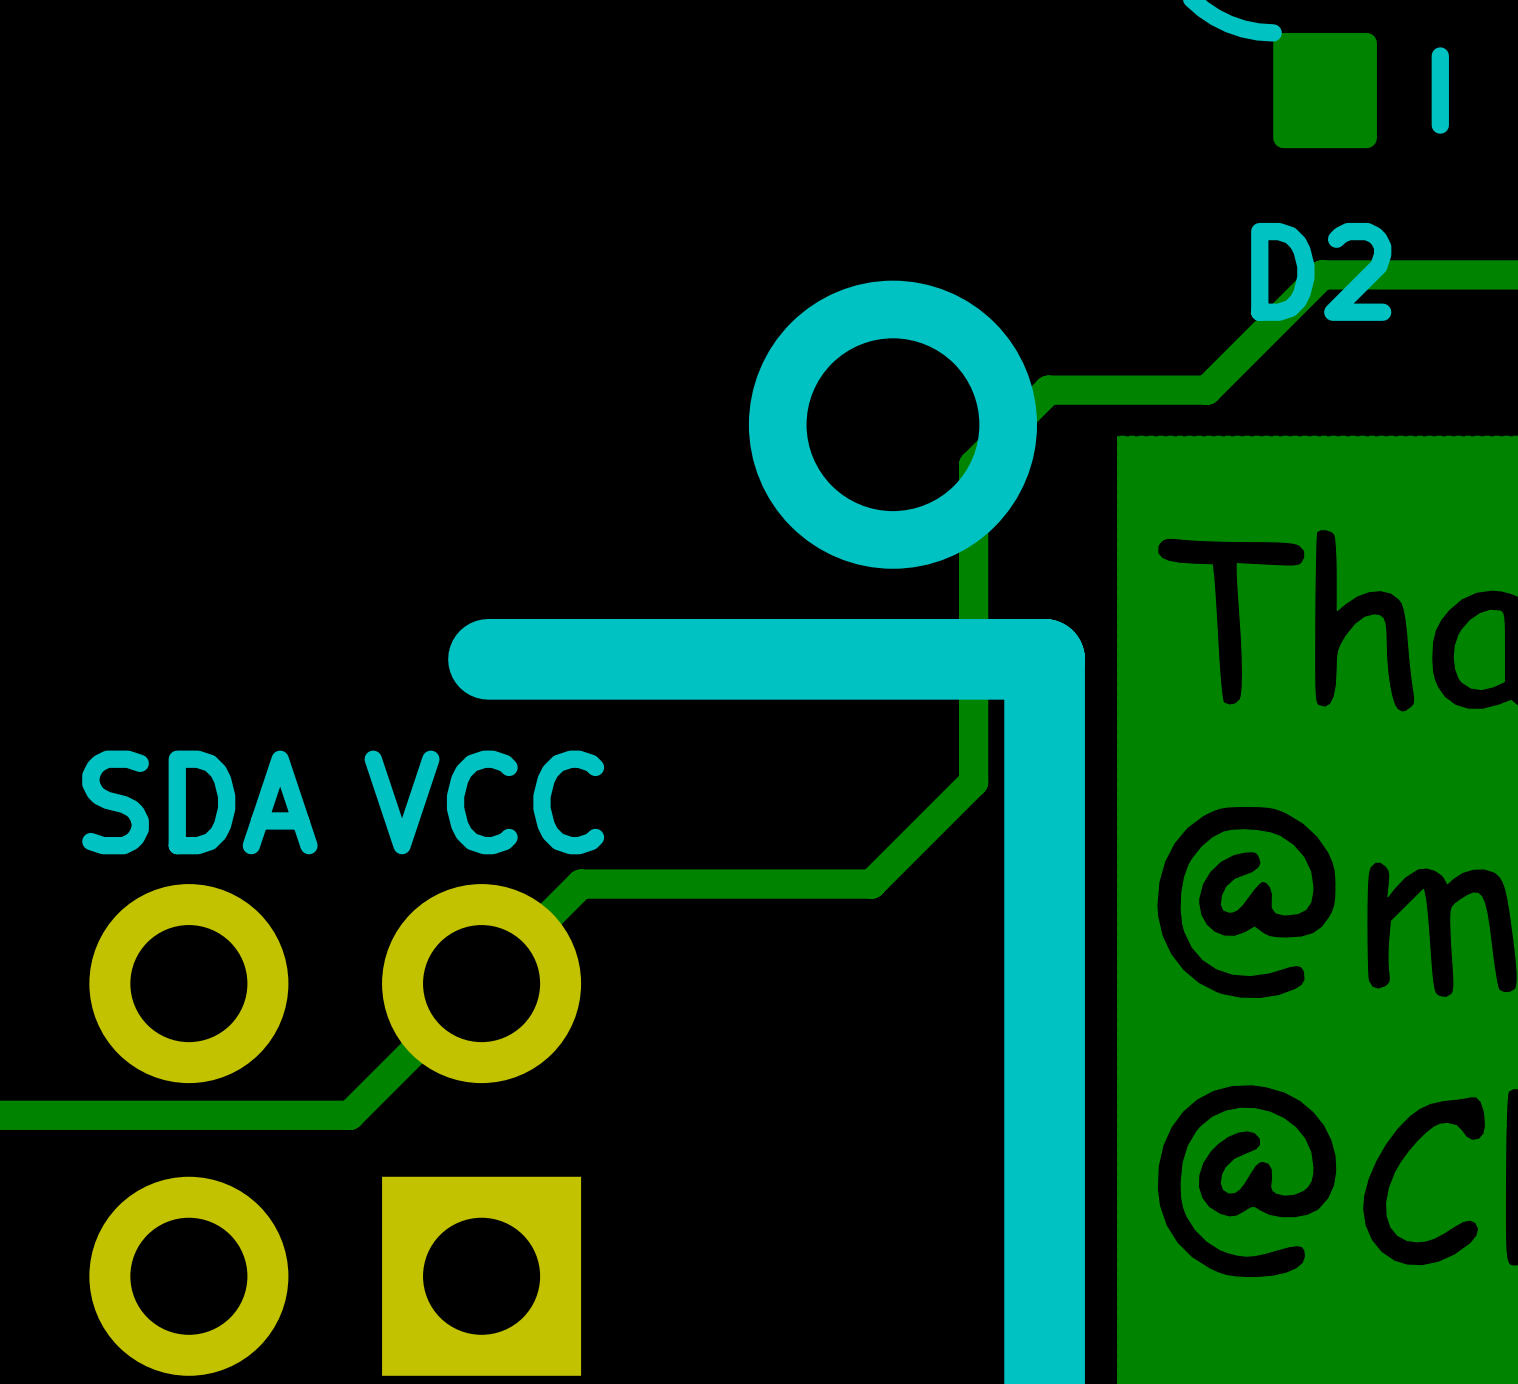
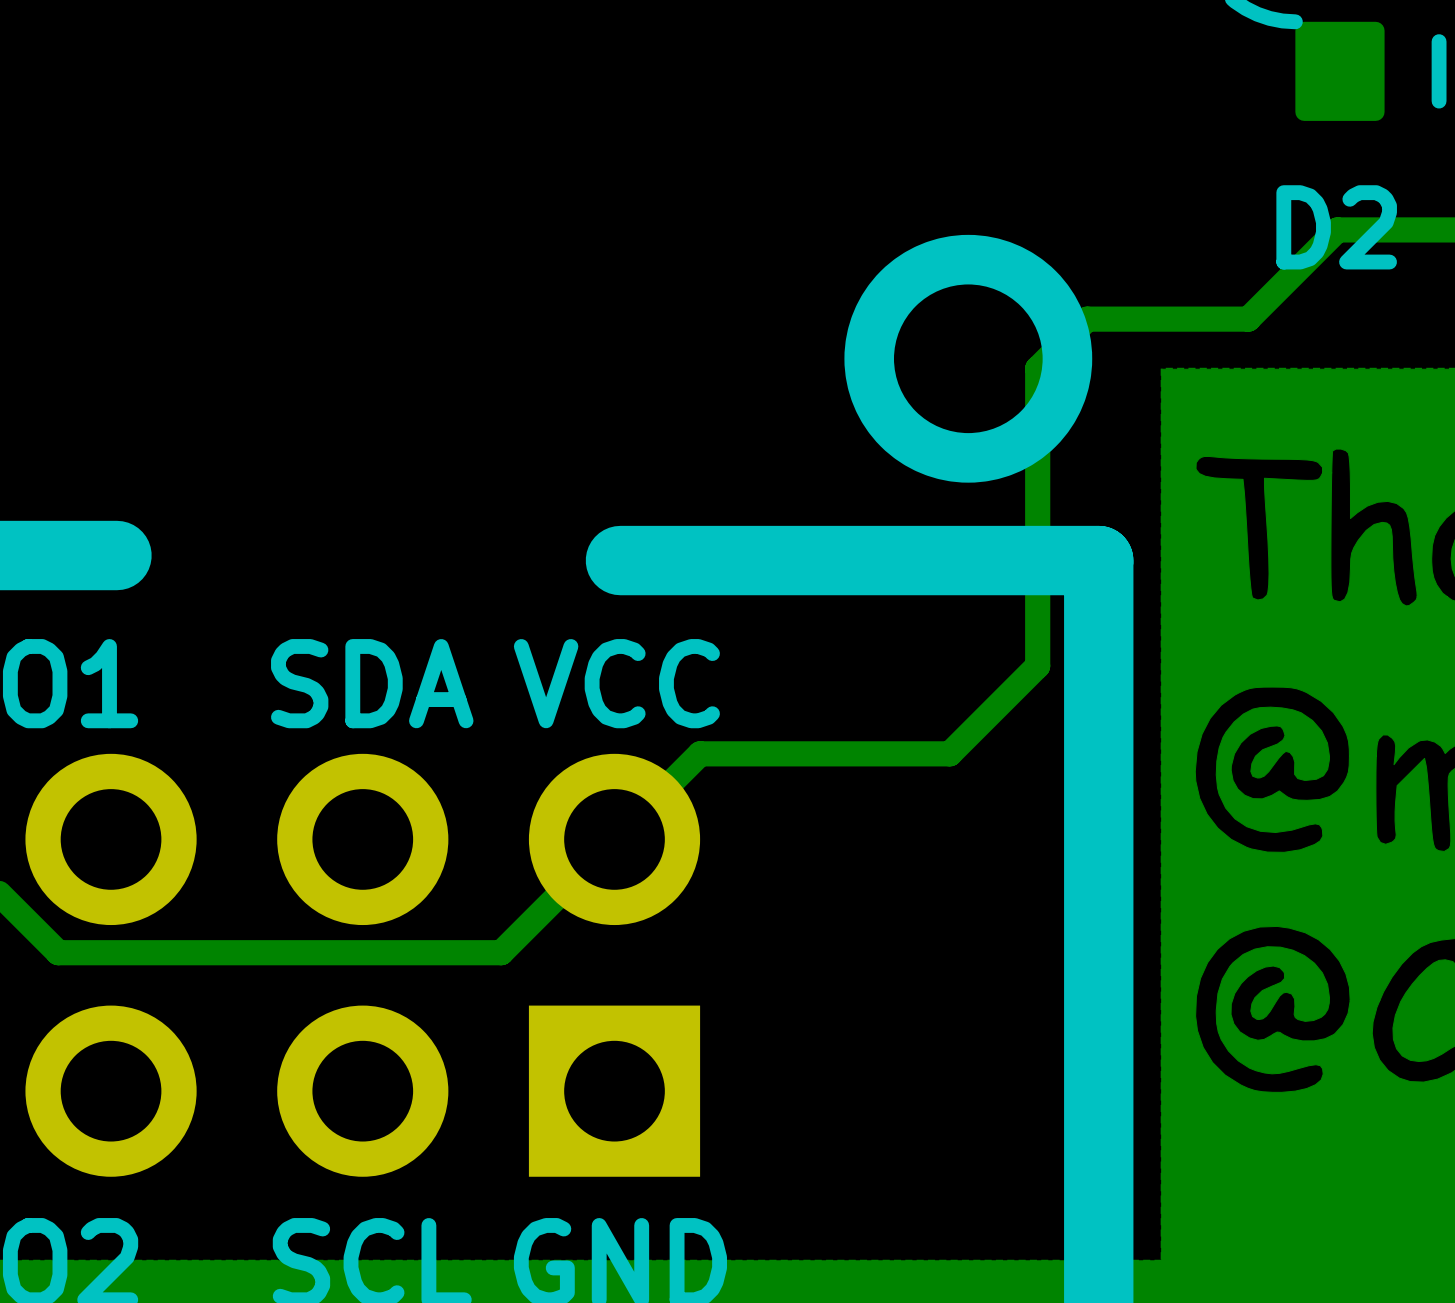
track: (1218, 378) (1206, 390) (1048, 390) (973, 465) -> (1248, 319) (1087, 319) (1037, 368) (1037, 393)

